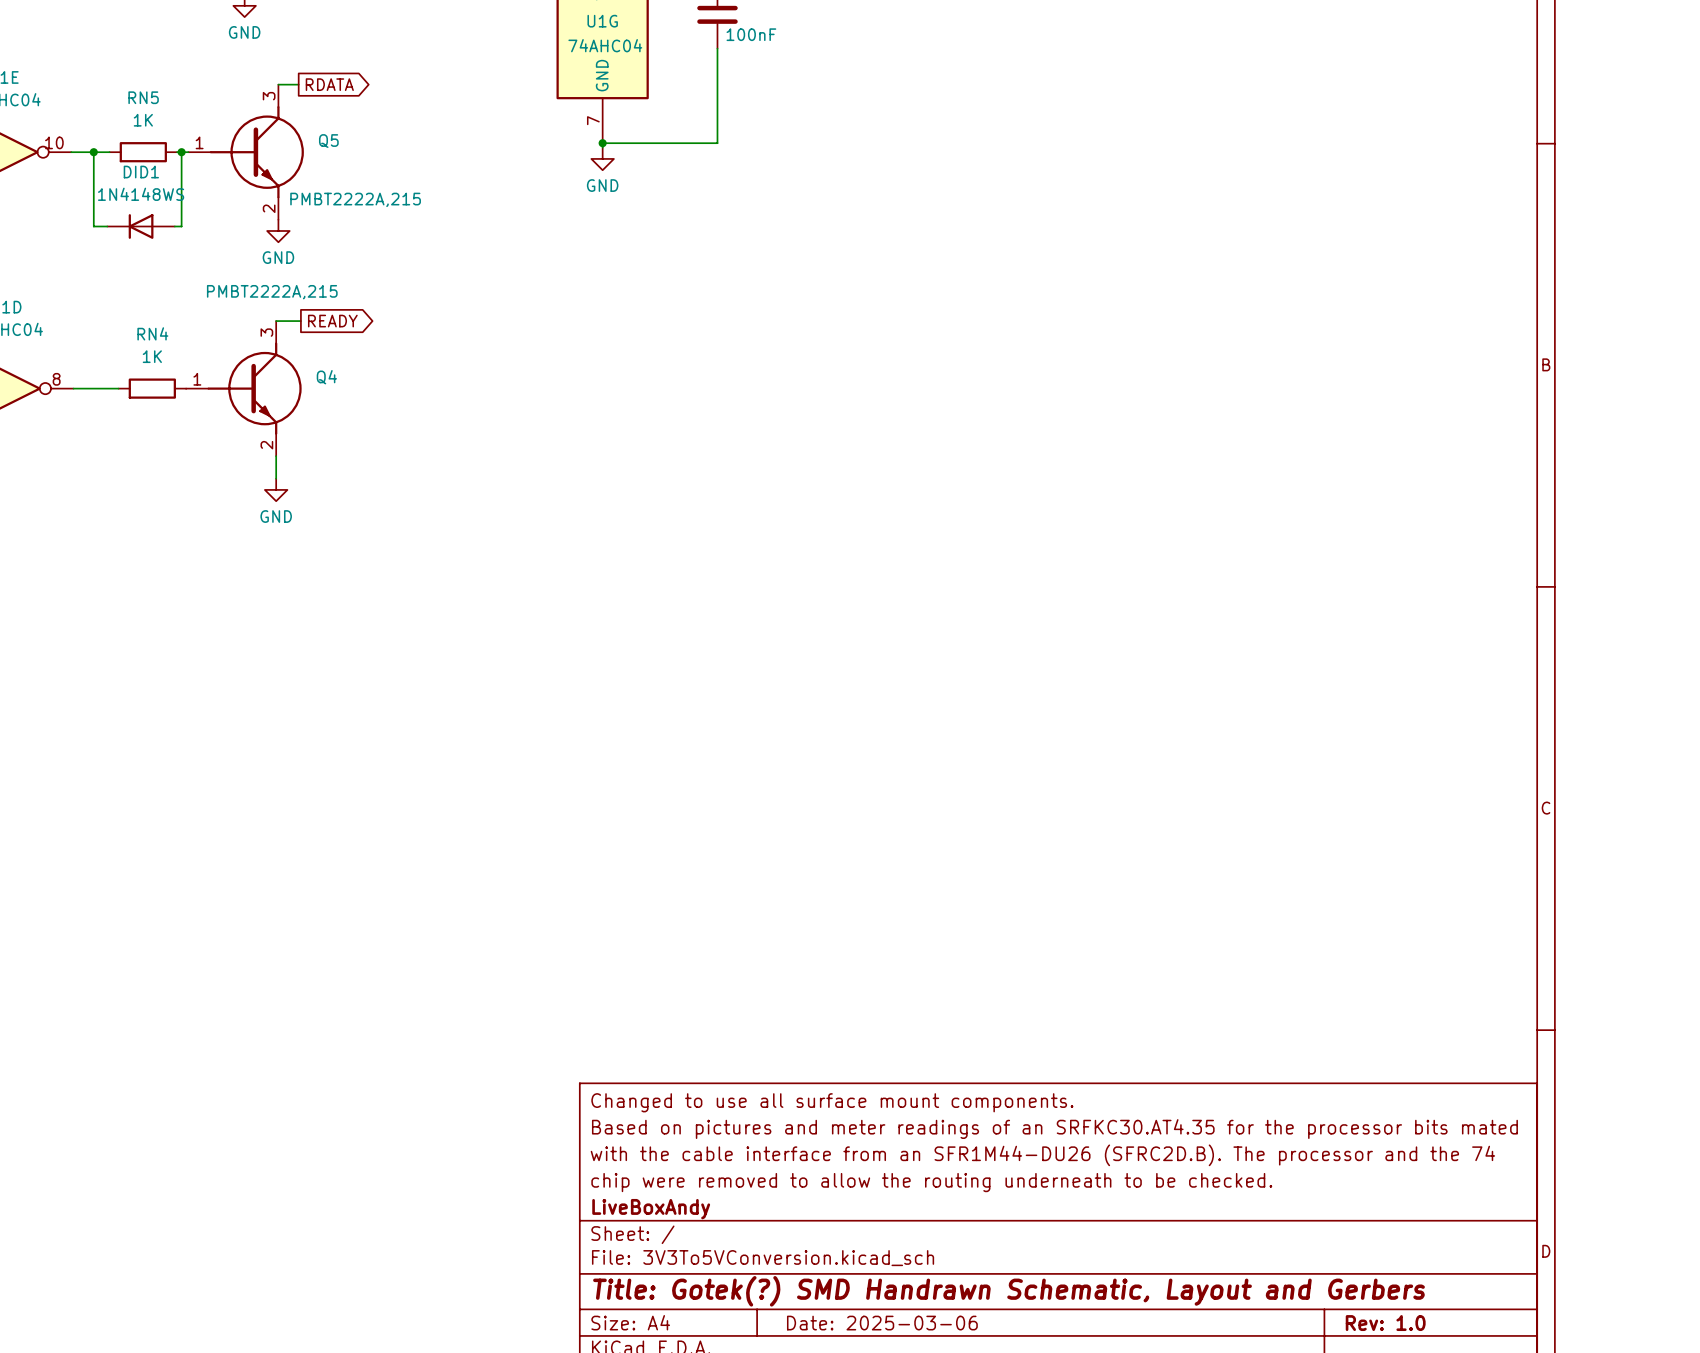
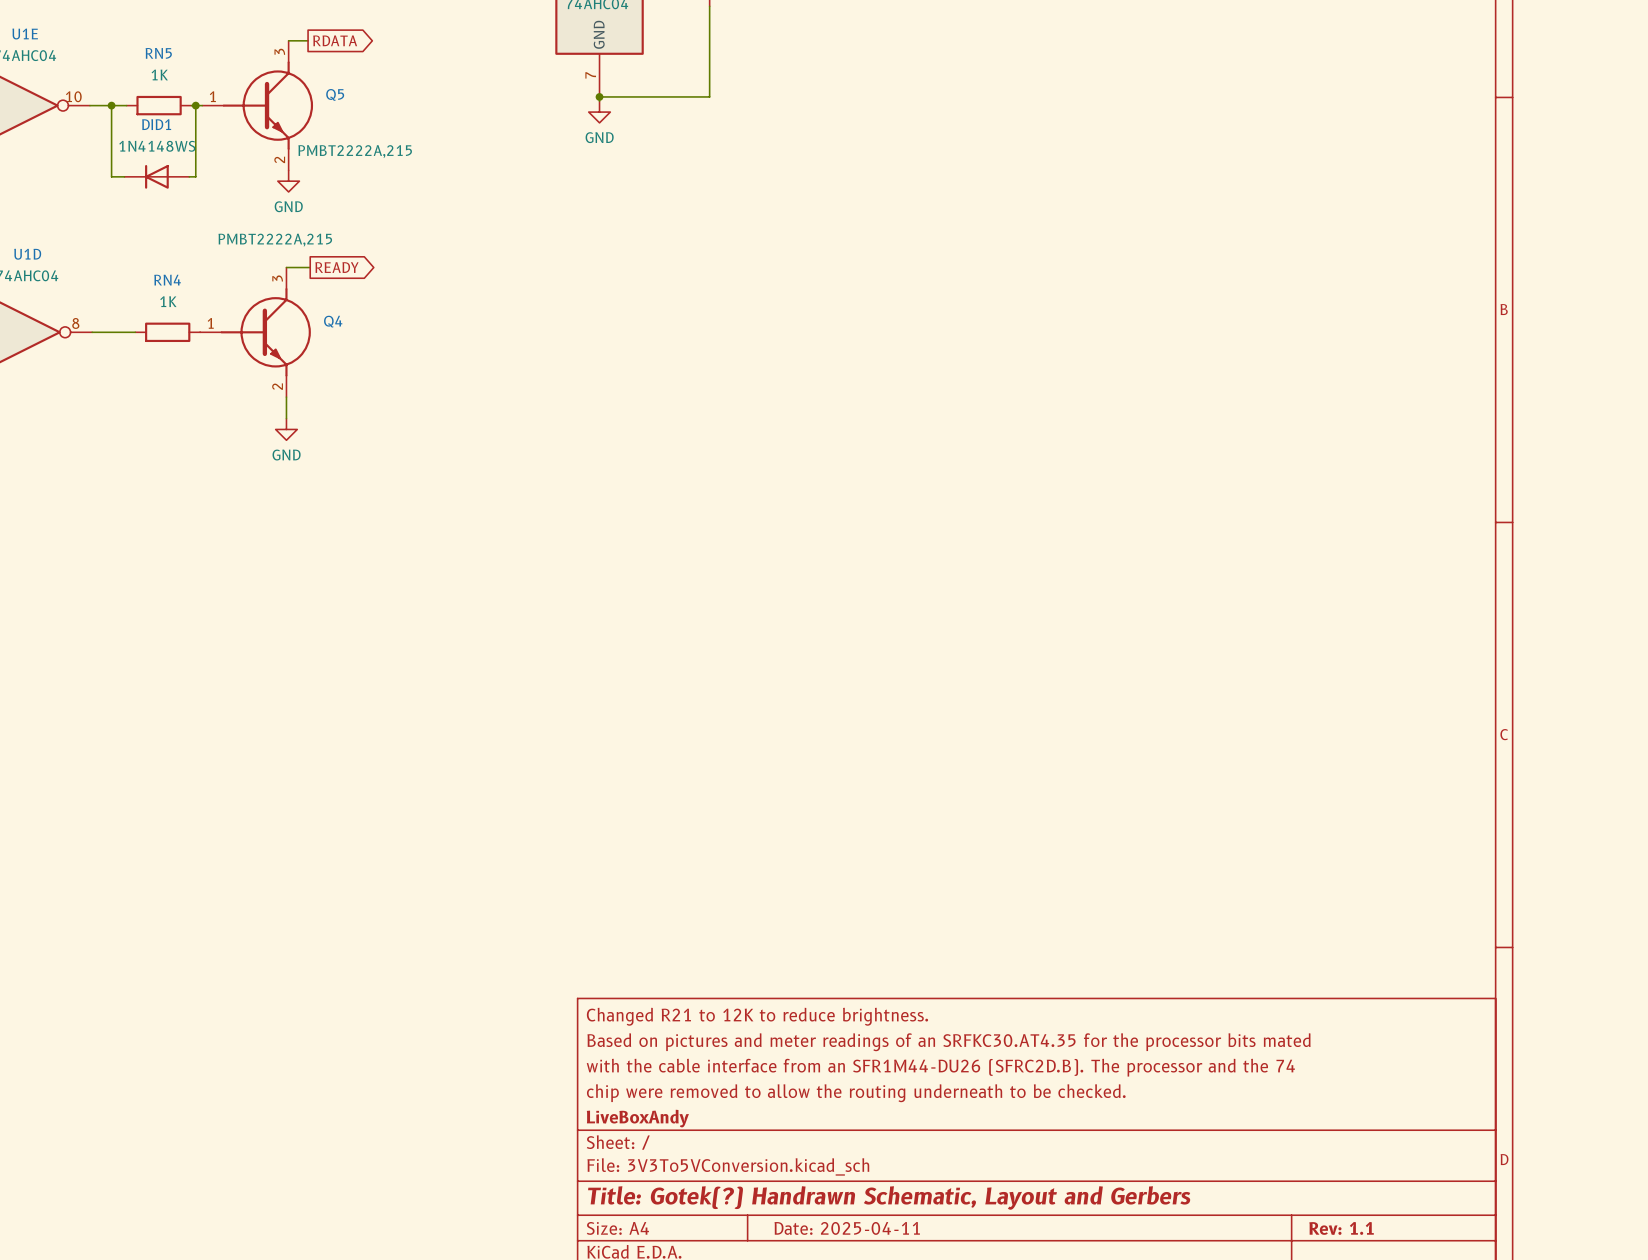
title block: Changed to use all surface mount components. (832, 1102) -> Changed R21 to 12K to reduce brightness. (757, 1016)
title block: Title: Gotek(?) SMD Handrawn Schematic, Layout and Gerbers (1009, 1291) -> Title: Gotek(?) Handrawn Schematic, Layout and Gerbers (889, 1197)
title block: Date: 2025-03-06 (882, 1323) -> Date: 2025-04-11 (847, 1228)
title block: Rev: 1.0 (1385, 1323) -> Rev: 1.1 (1341, 1228)

